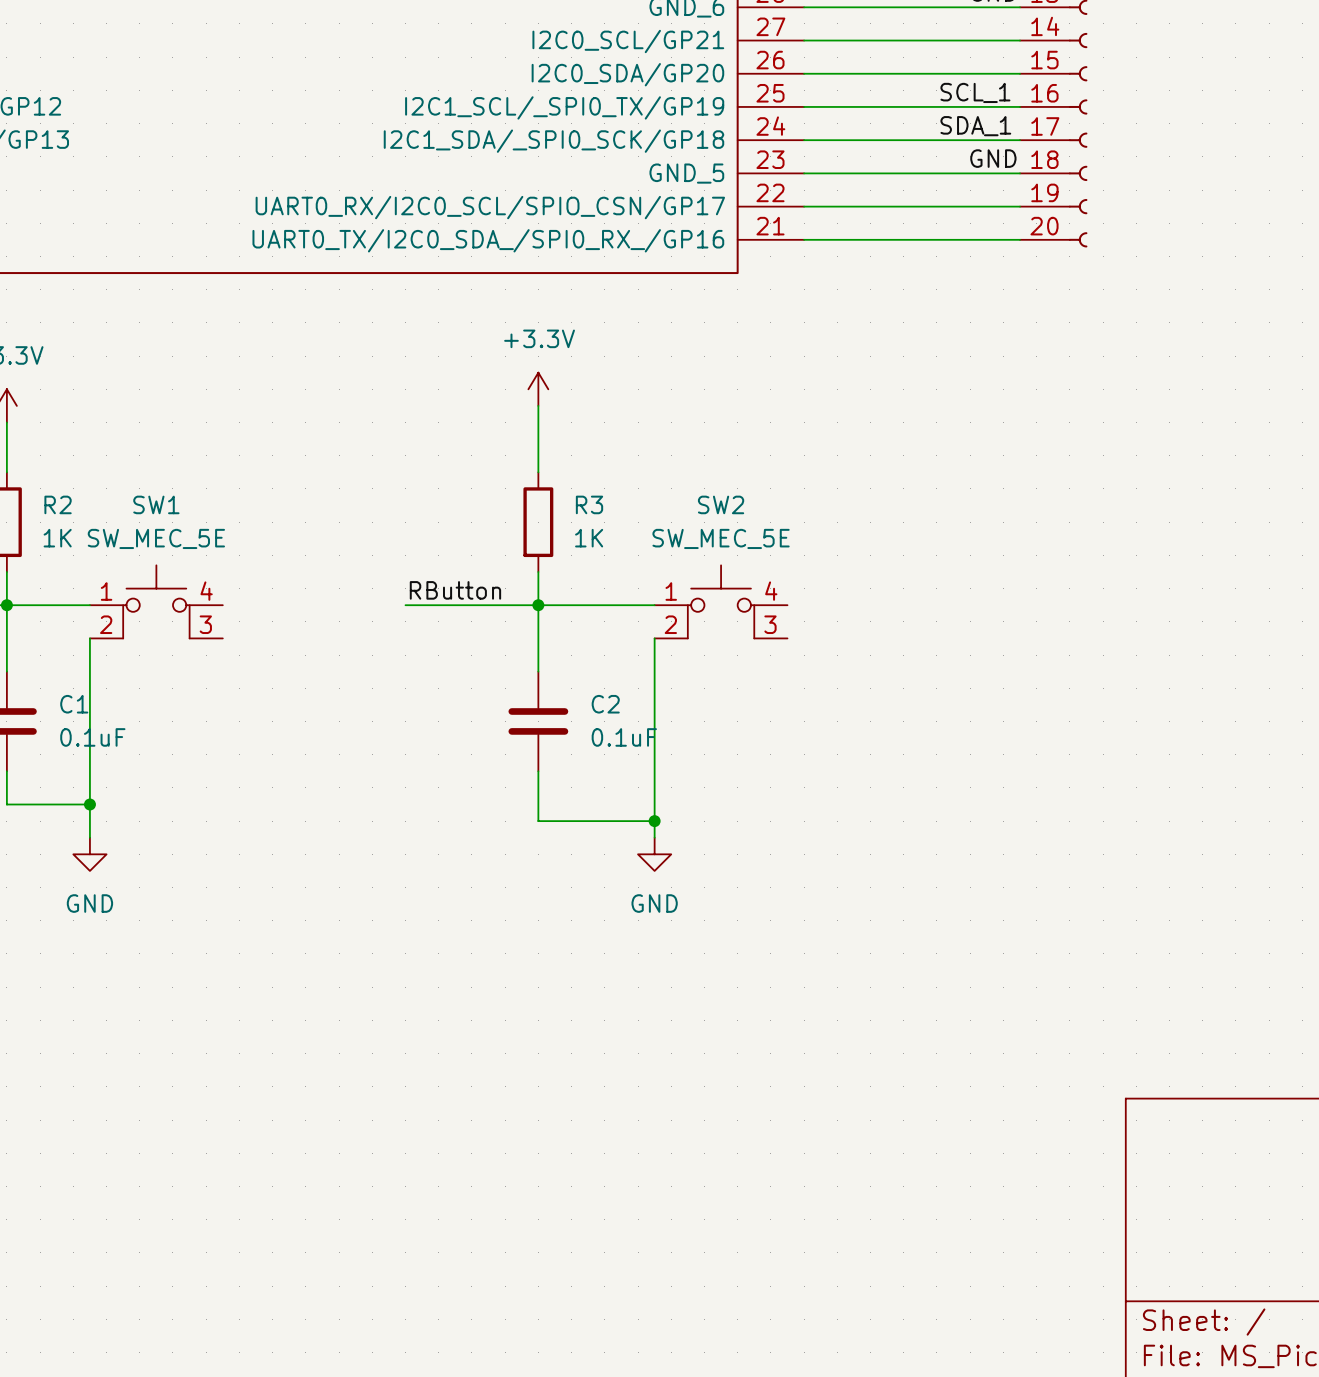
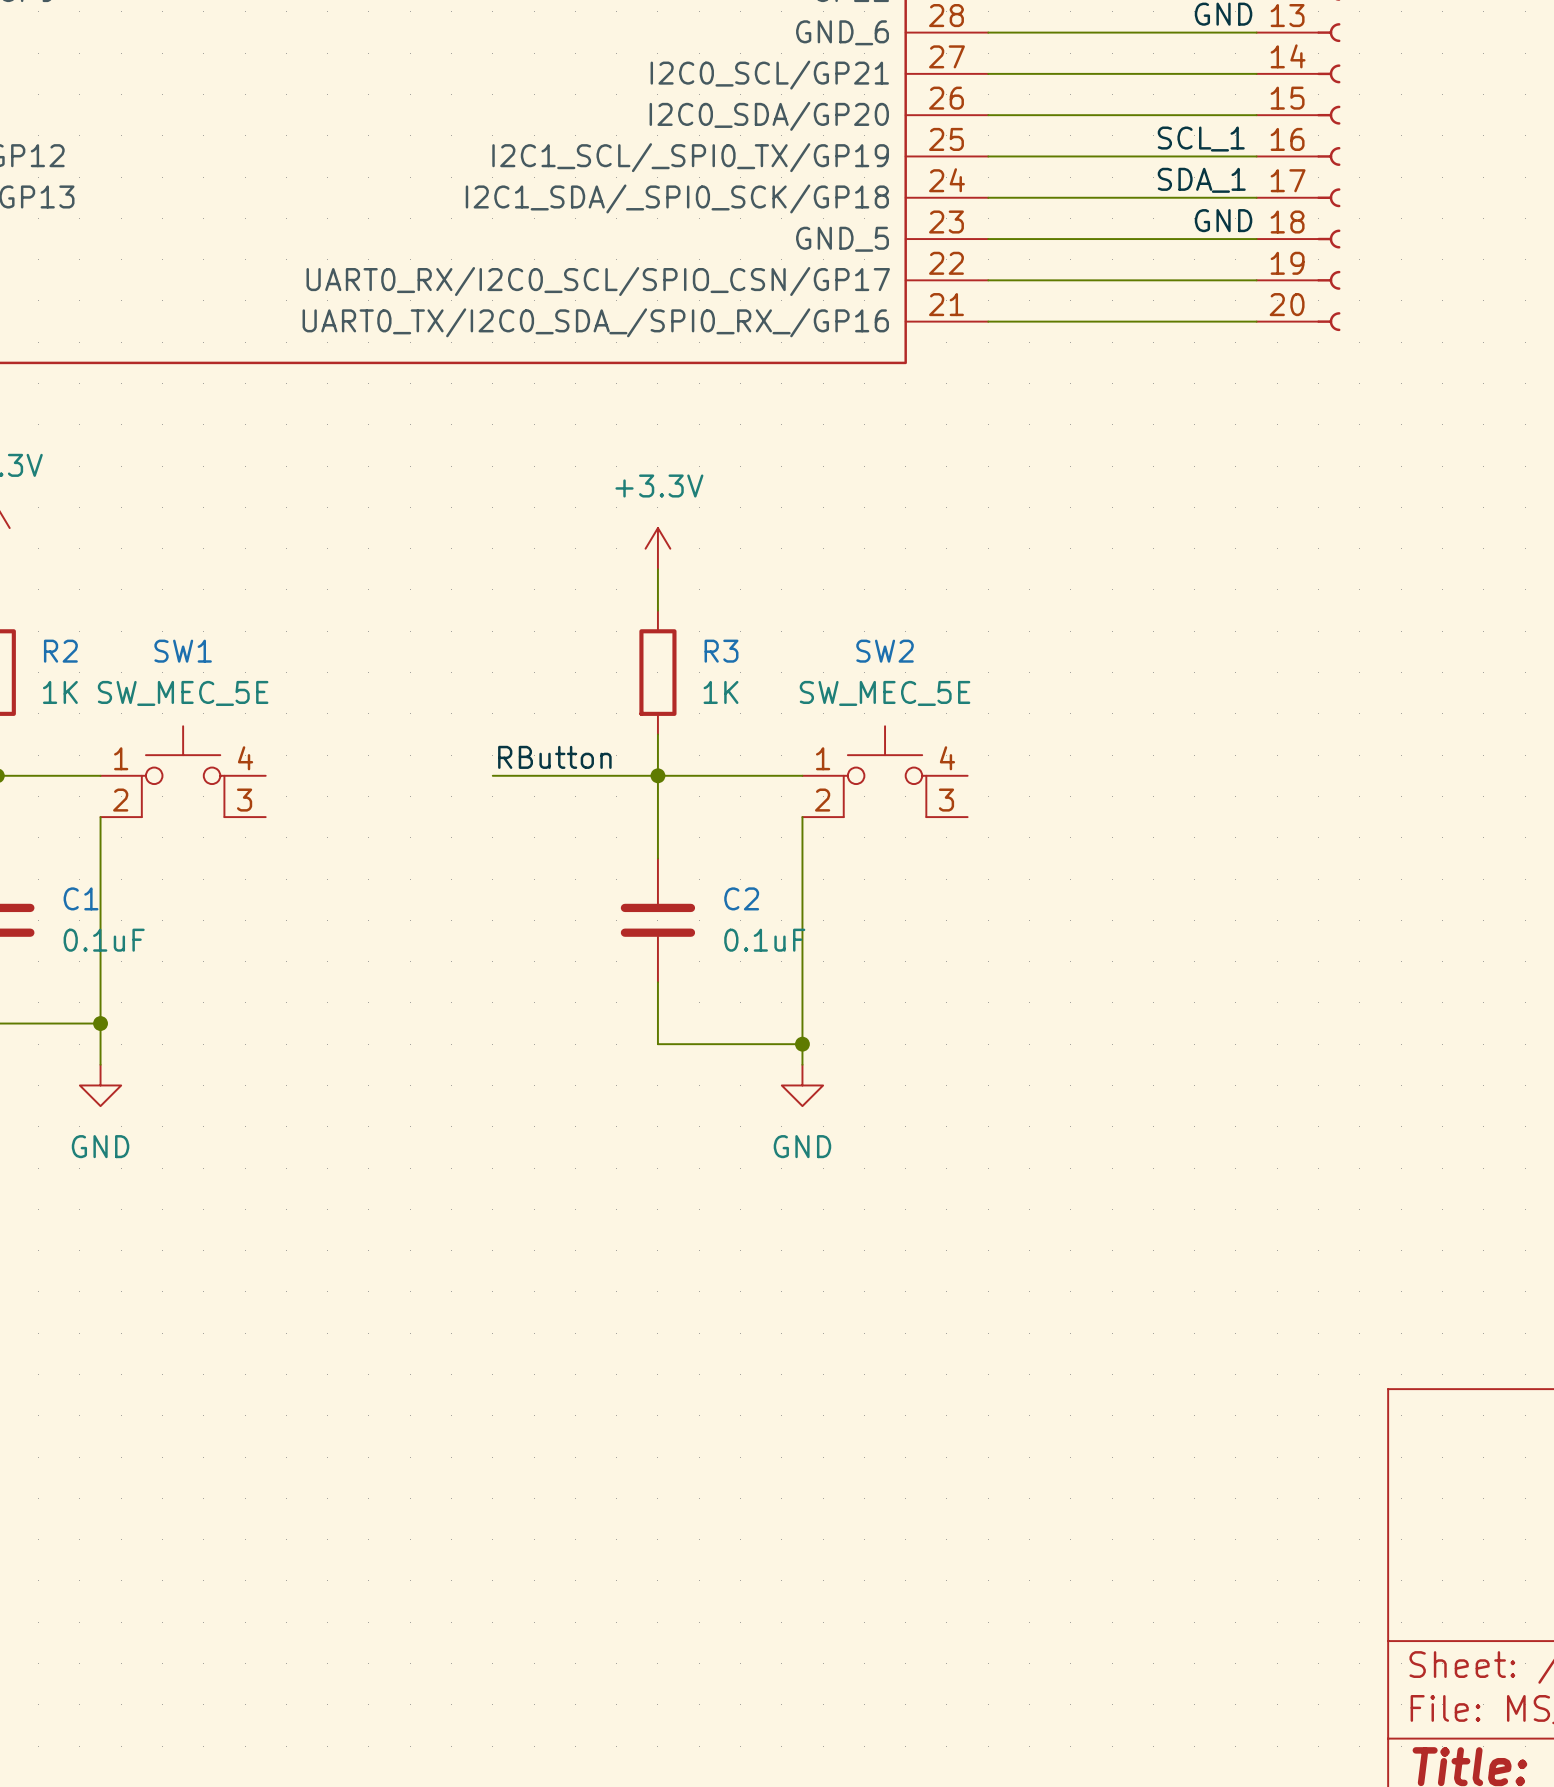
power symbol position: +3.3V (538, 389) -> +3.3V (657, 548)

